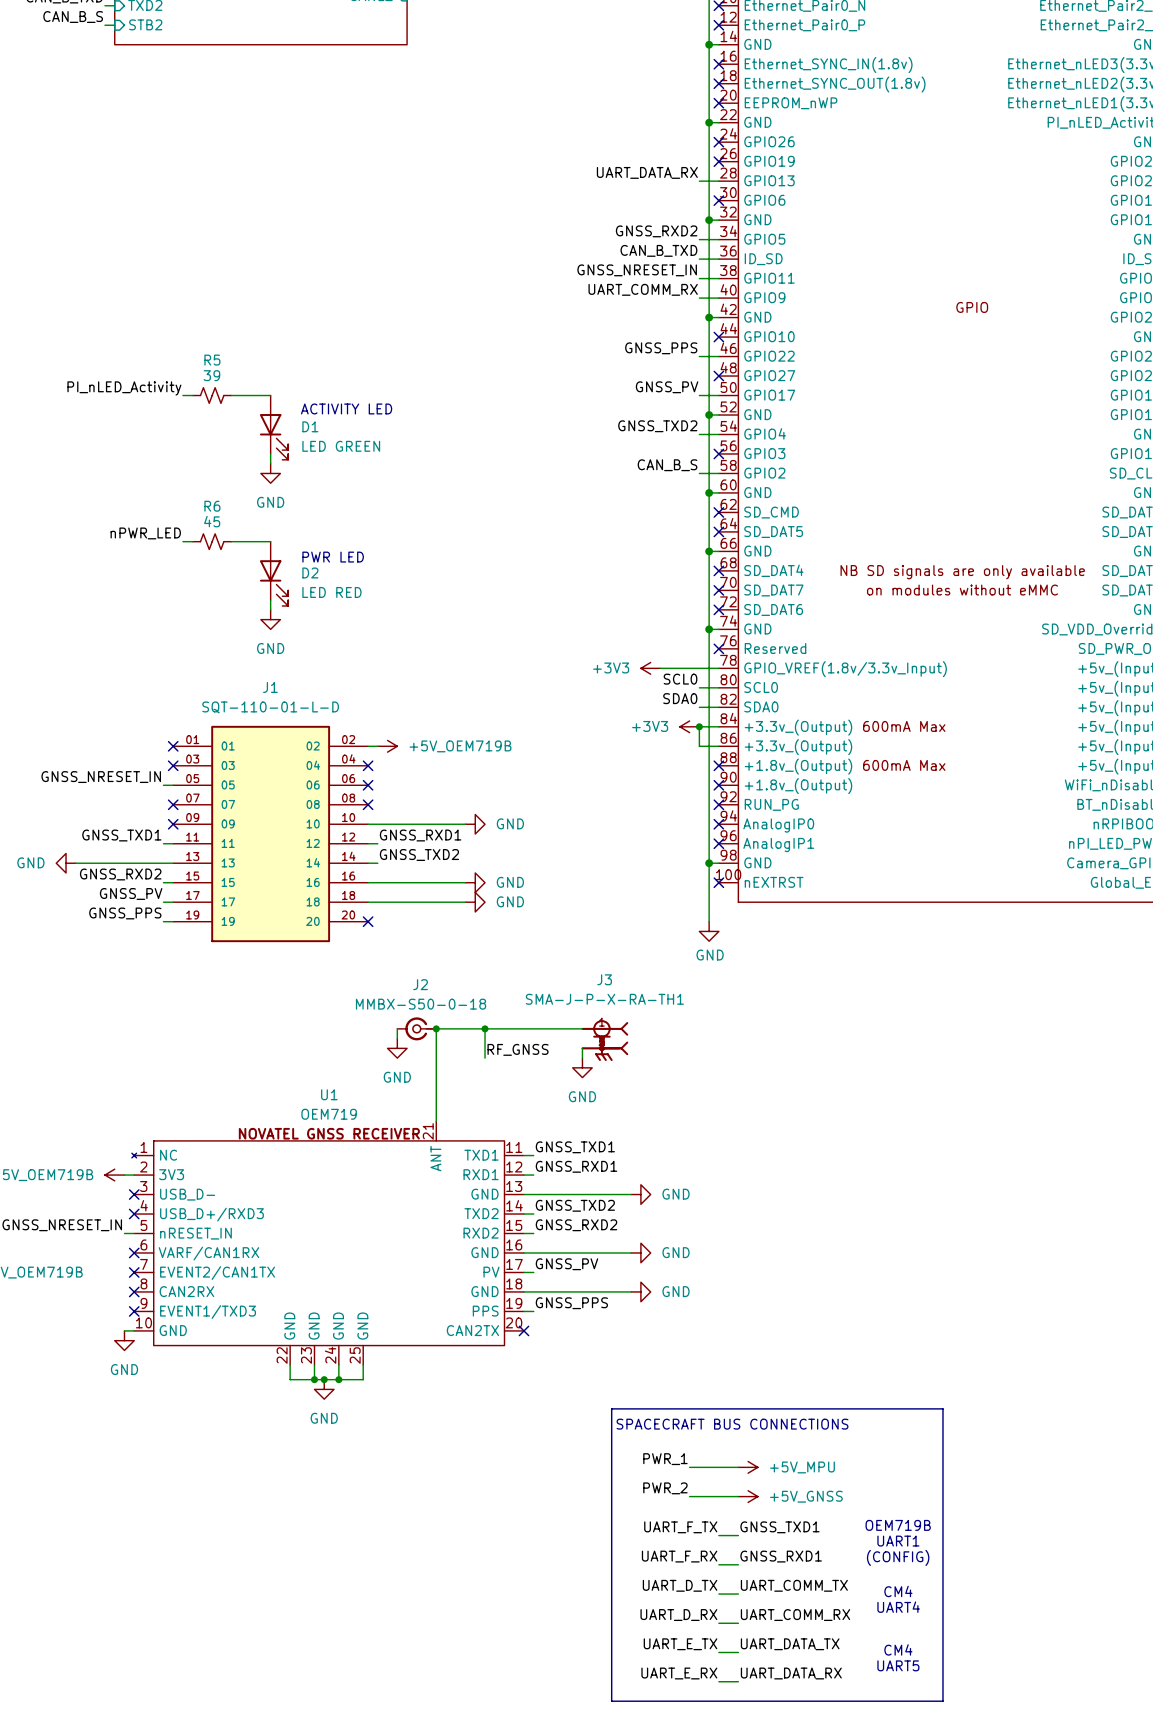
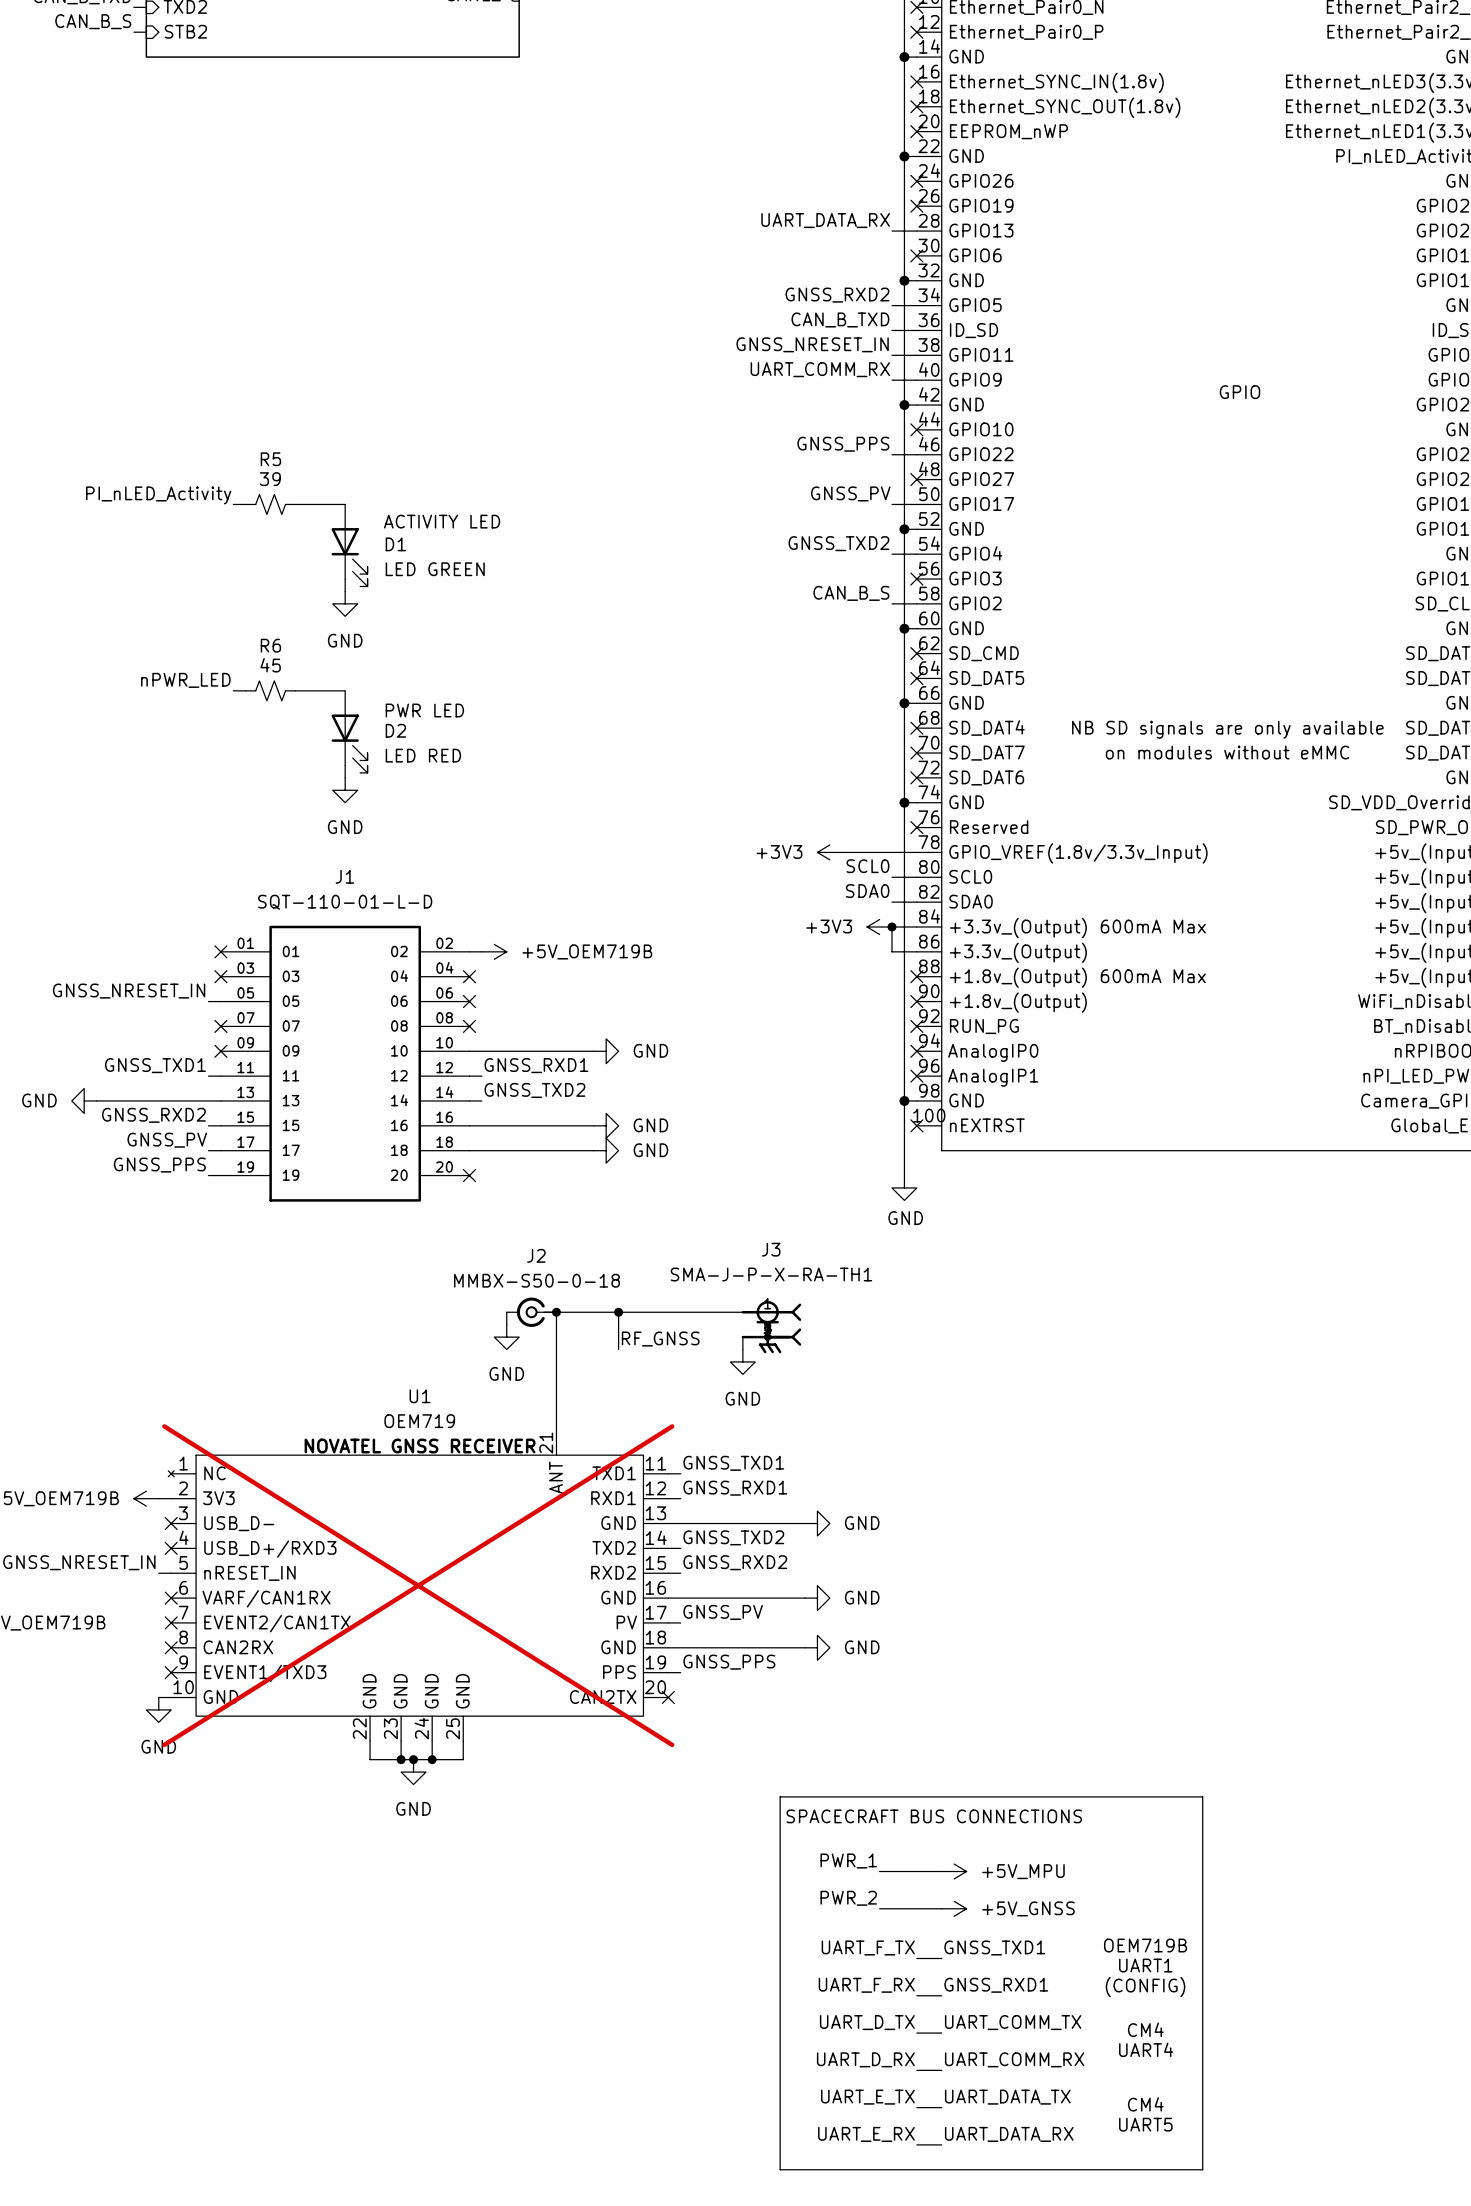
U1 do-not-place cross: none -> (418, 1585)

